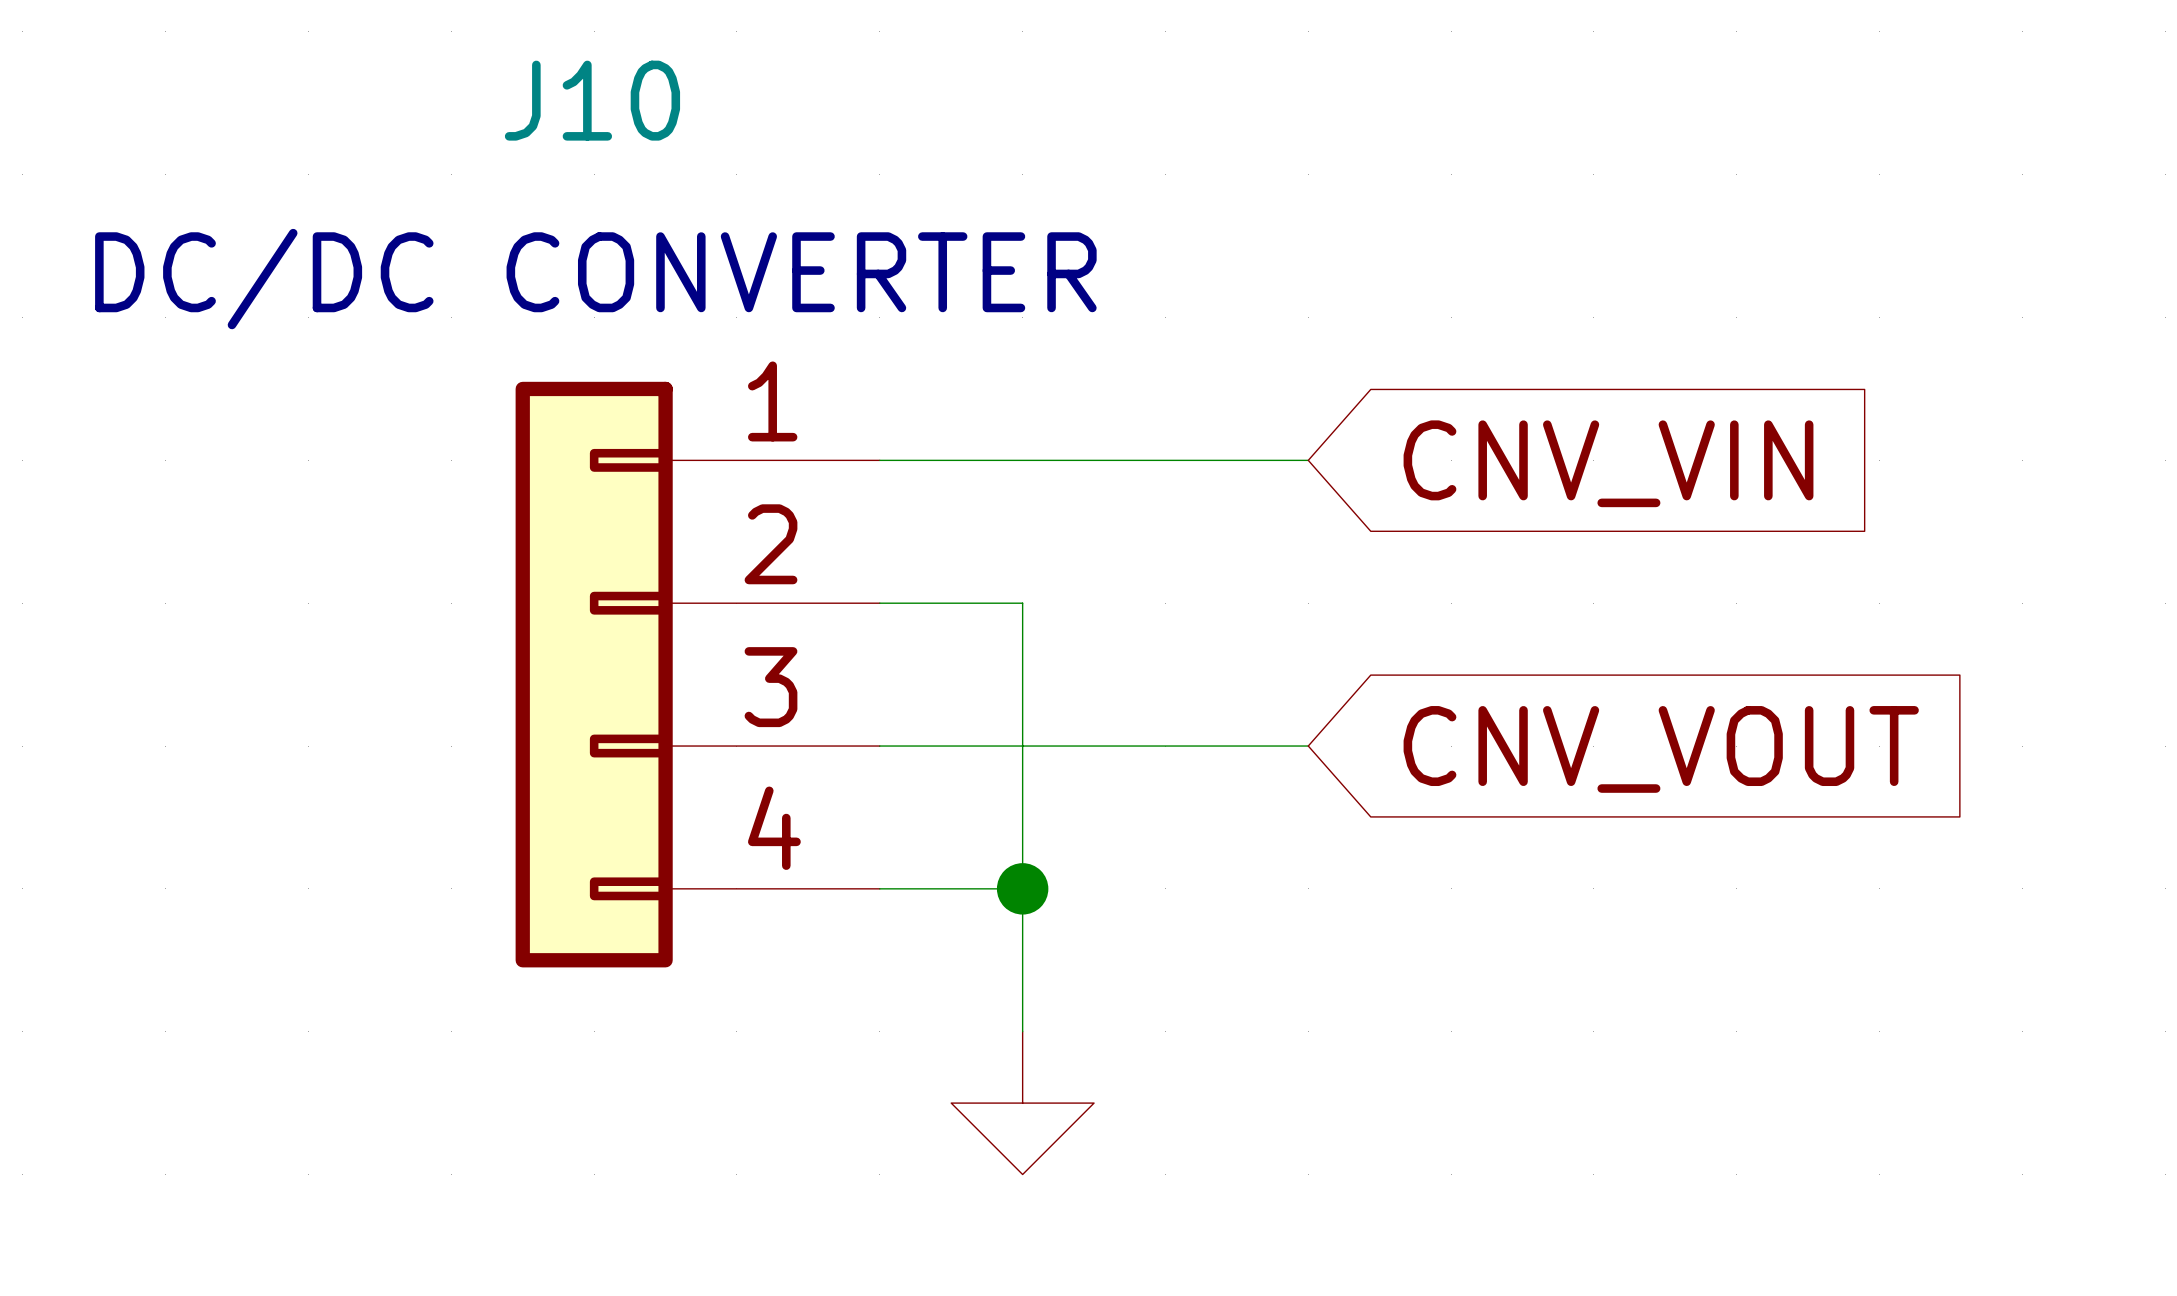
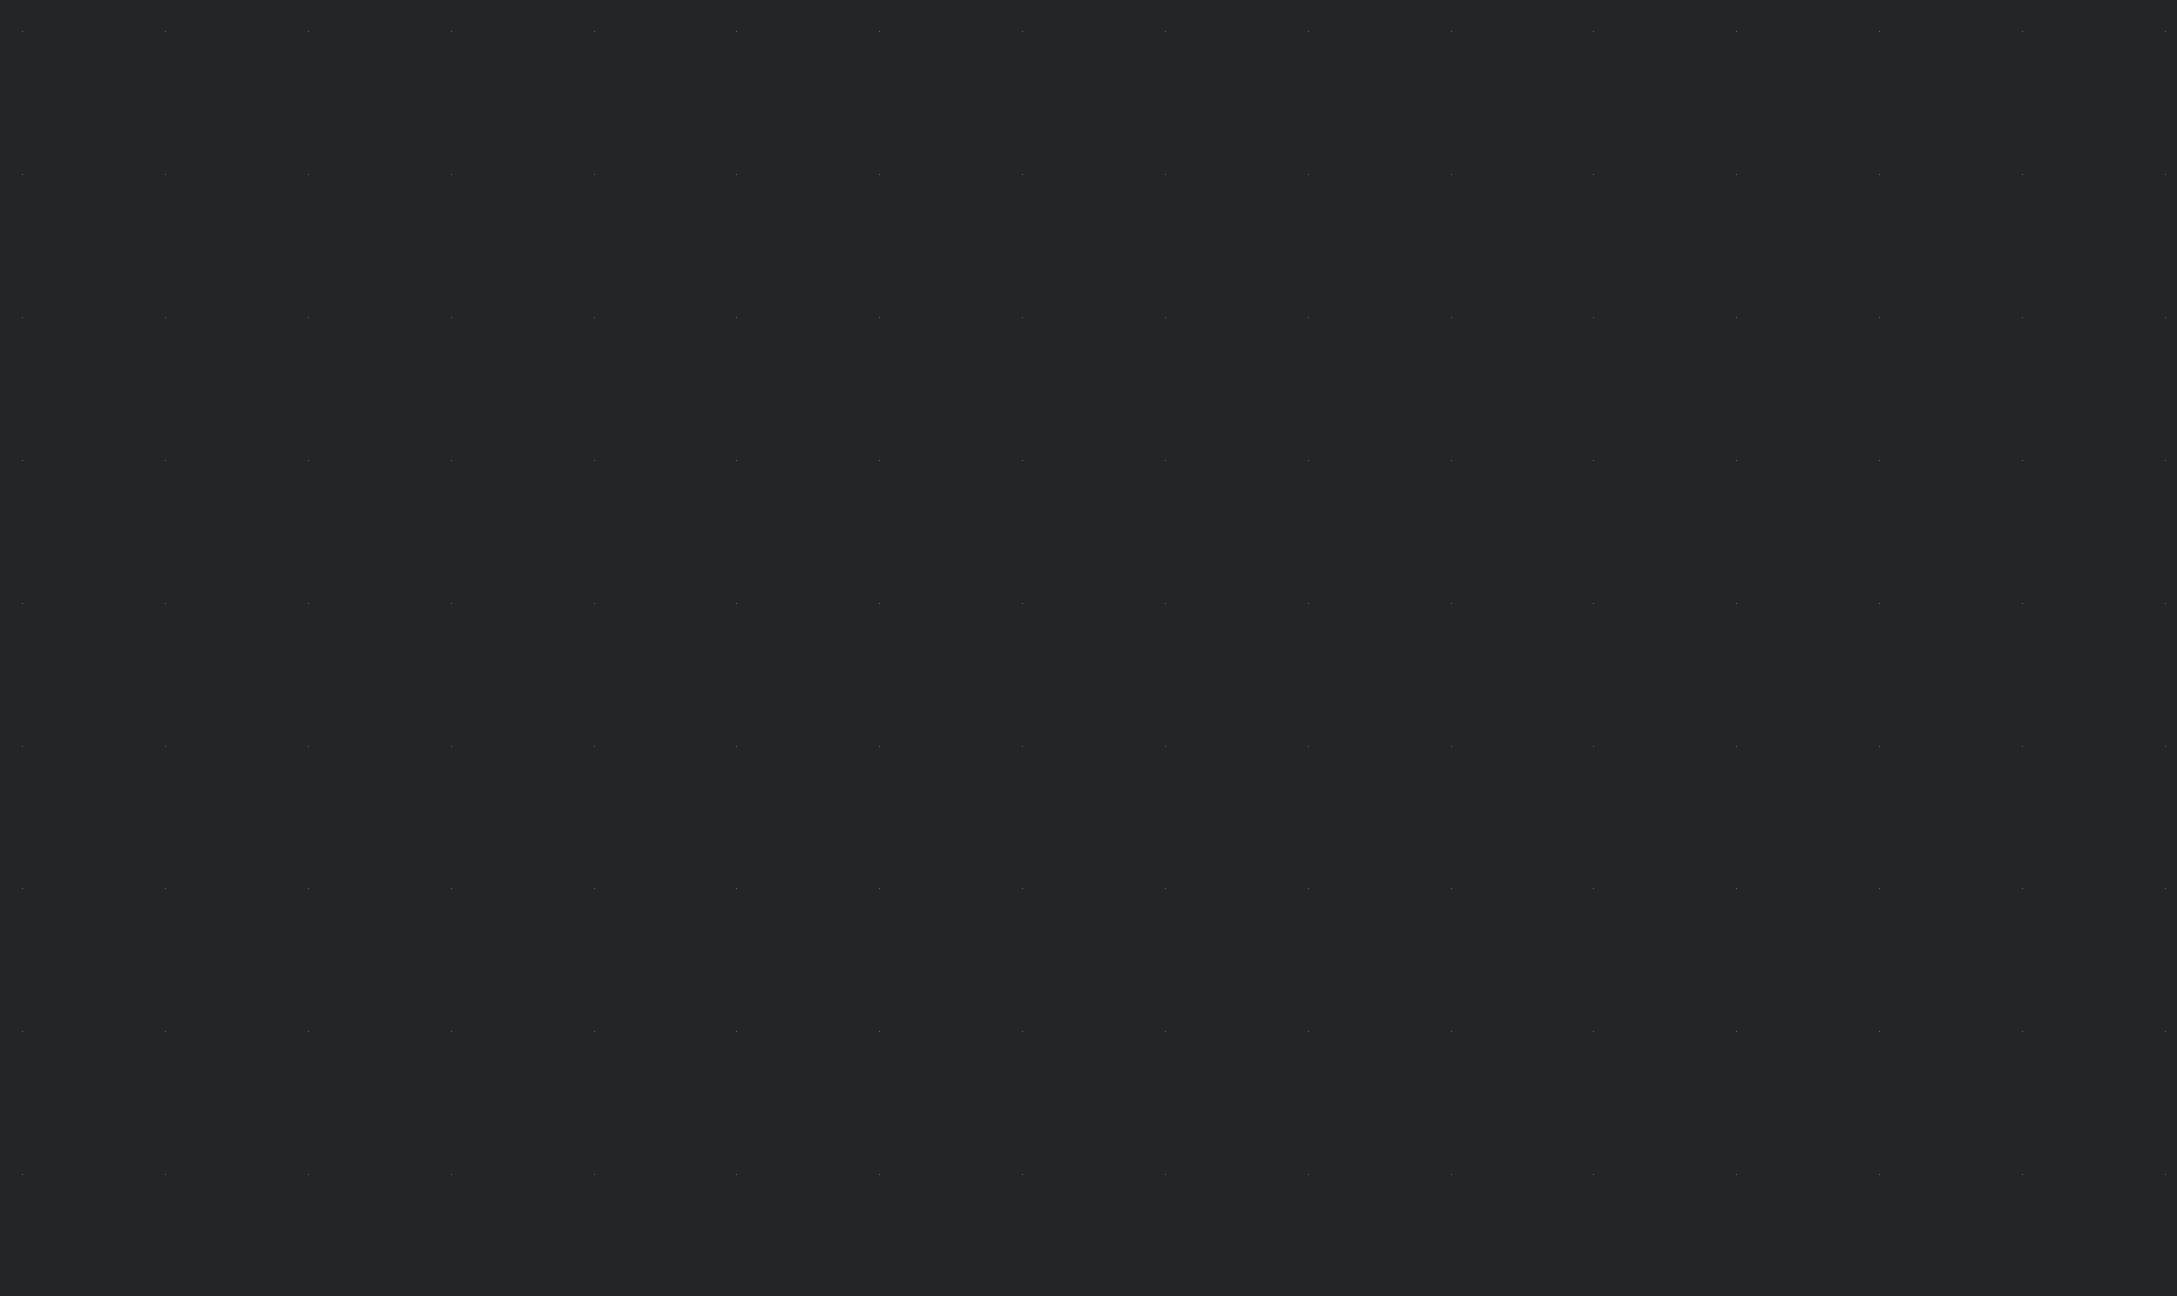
text: DC/DC CONVERTER (595, 279) -> none
wire: (879, 460) (1308, 460) -> none
global label: CNV_VIN (1608, 463) -> none
wire: (879, 603) (1022, 603) (1022, 1031) -> none
J10: (697, 674) -> none
wire: (879, 746) (1308, 746) -> none
global label: CNV_VOUT (1661, 749) -> none
wire: (879, 888) (1022, 888) -> none
junction: (1022, 888) -> none
power symbol: (1022, 1103) -> none

